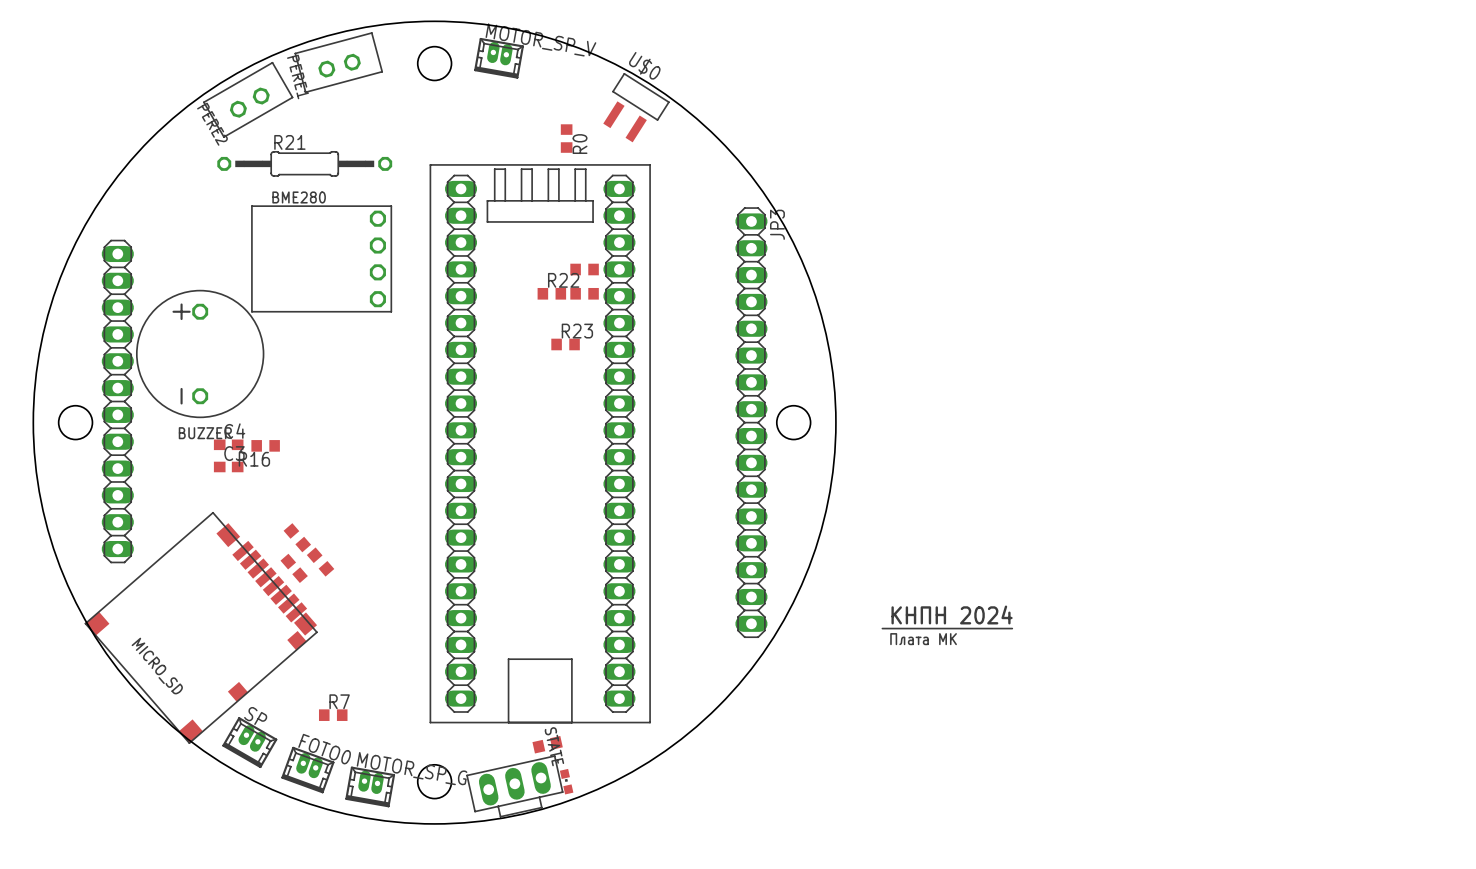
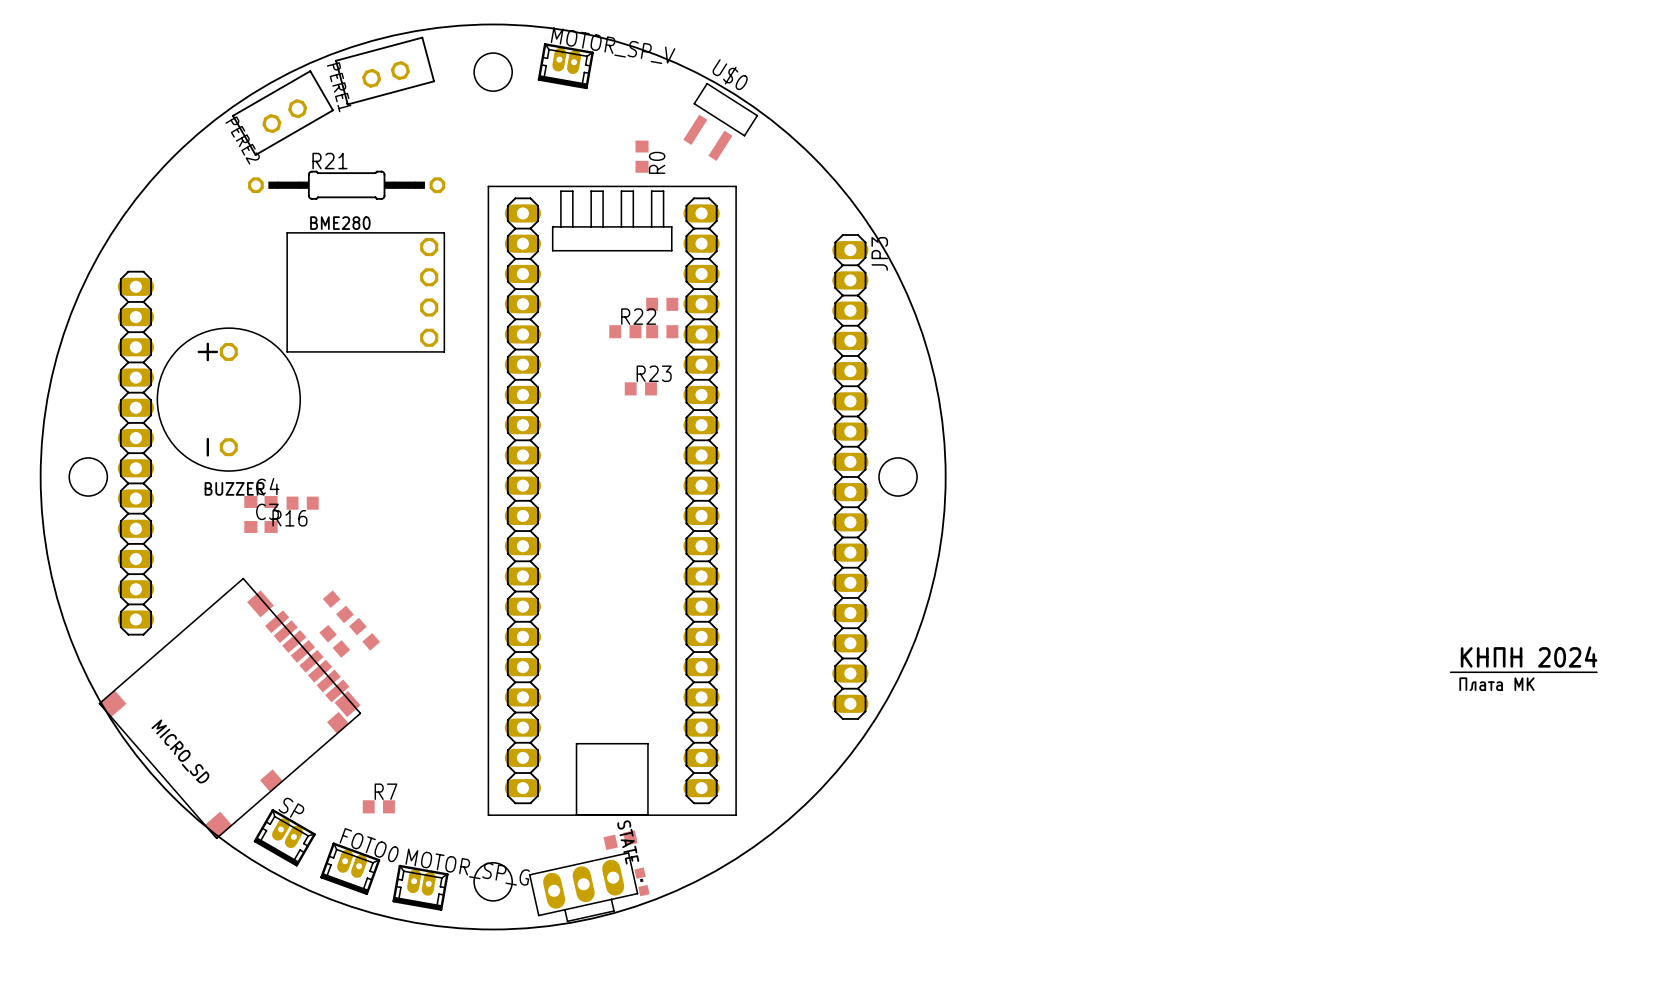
drawing: none -> [1449, 671, 1598, 673]
drawing: [881, 628, 1013, 630] -> none

